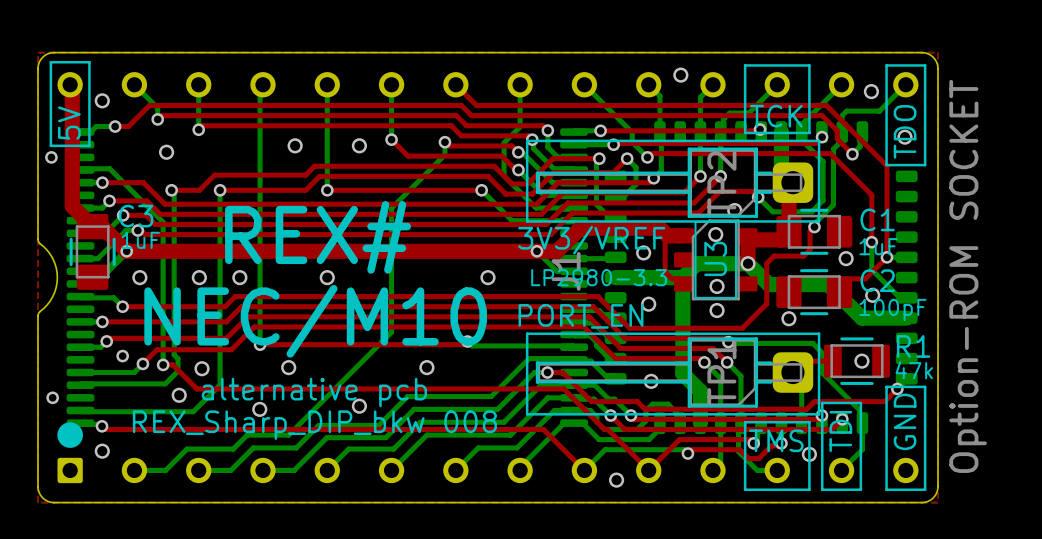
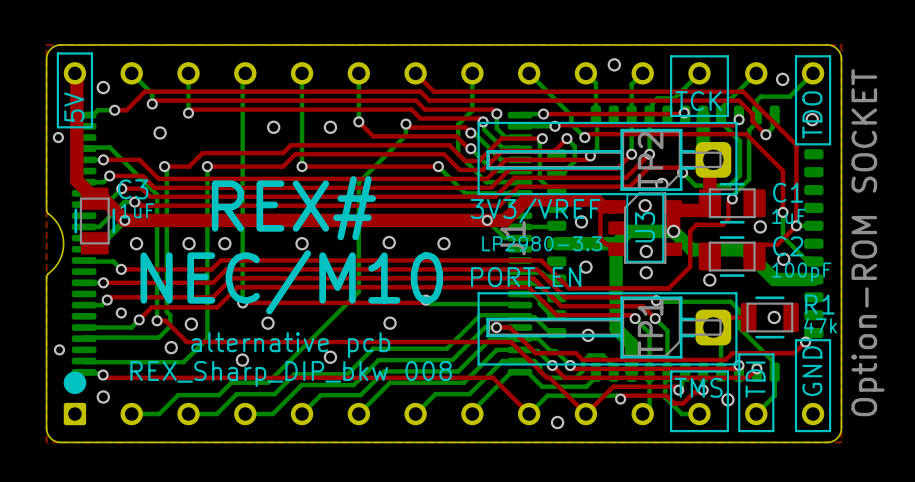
via: none -> (389, 242)

